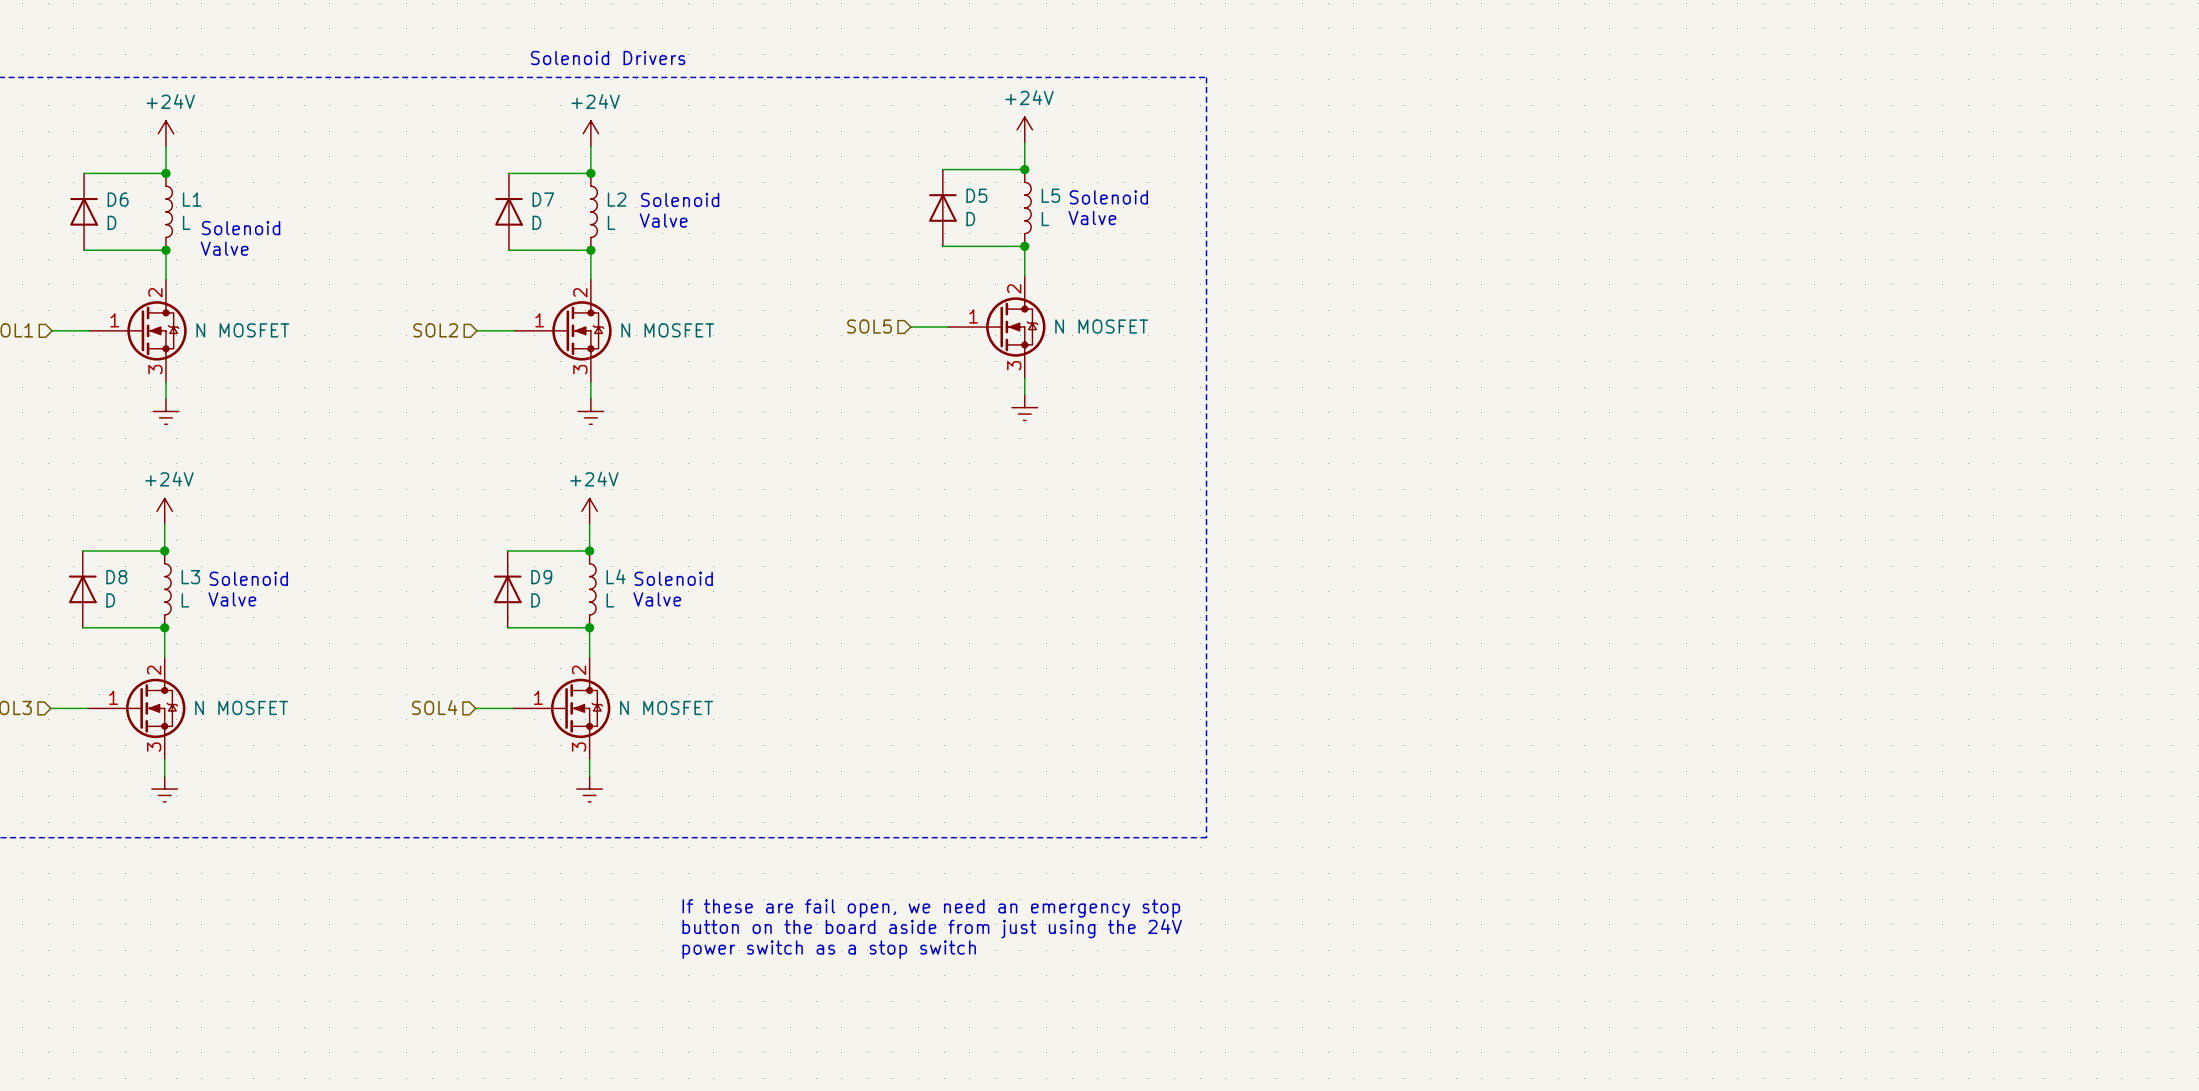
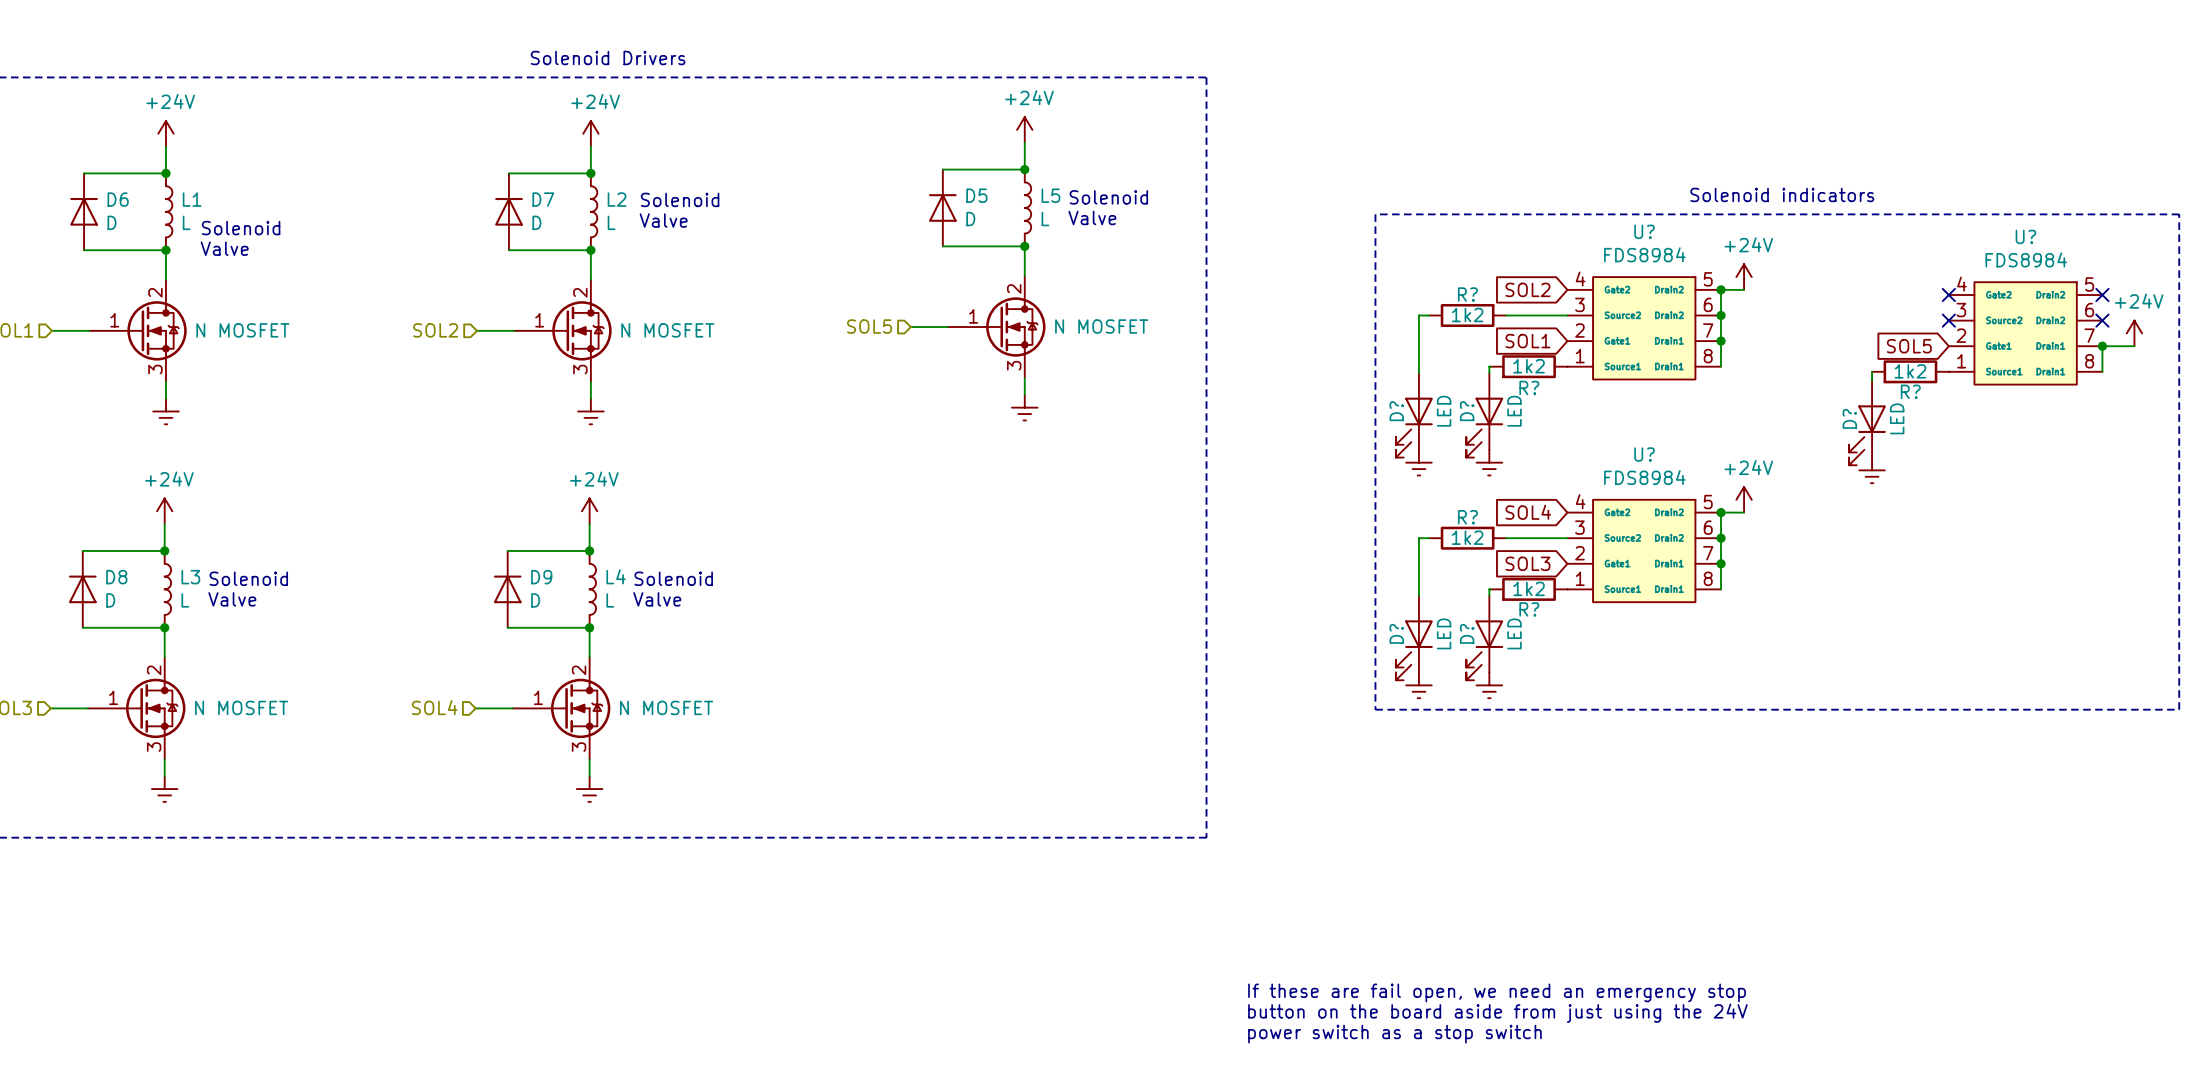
text: none -> Solenoid indicators (1782, 194)
line: none -> (1375, 214) (1375, 709) (2179, 709) (2179, 214) (1375, 214)
power symbol: none -> +24V (1744, 277)
global label: none -> SOL2 (1527, 289)
junction: none -> (1721, 289)
wire: none -> (1744, 289) (1721, 289) (1721, 366)
no-connect mark: none -> (1948, 295)
no-connect mark: none -> (2102, 295)
wire: none -> (1429, 315) (1418, 315) (1418, 373)
R?: none -> 1k2 (1467, 315)
wire: none -> (1506, 315) (1567, 315)
junction: none -> (1721, 315)
no-connect mark: none -> (1948, 320)
no-connect mark: none -> (2102, 320)
U?: none -> FDS8984 (1644, 328)
U?: none -> FDS8984 (2025, 333)
power symbol: none -> +24V (2134, 333)
global label: none -> SOL1 (1527, 341)
junction: none -> (1721, 341)
global label: none -> SOL5 (1909, 346)
junction: none -> (2102, 346)
wire: none -> (2134, 346) (2102, 346) (2102, 371)
wire: none -> (1490, 366) (1489, 373)
R?: none -> 1k2 (1529, 366)
wire: none -> (1872, 371) (1872, 380)
R?: none -> 1k2 (1910, 371)
D?: none -> LED (1414, 415)
D?: none -> LED (1484, 415)
D?: none -> LED (1867, 423)
power symbol: none -> (1418, 462)
power symbol: none -> (1489, 462)
power symbol: none -> (1872, 470)
power symbol: none -> +24V (1744, 499)
global label: none -> SOL4 (1528, 512)
junction: none -> (1721, 512)
wire: none -> (1744, 512) (1721, 512) (1721, 589)
wire: none -> (1429, 538) (1418, 538) (1418, 595)
R?: none -> 1k2 (1467, 538)
wire: none -> (1506, 538) (1567, 538)
junction: none -> (1721, 538)
U?: none -> FDS8984 (1644, 550)
global label: none -> SOL3 (1527, 563)
junction: none -> (1721, 563)
wire: none -> (1490, 589) (1489, 595)
R?: none -> 1k2 (1529, 589)
D?: none -> LED (1414, 638)
D?: none -> LED (1484, 638)
power symbol: none -> (1418, 685)
power symbol: none -> (1489, 685)
text: If these are fail open, we need an emergency stop (931, 908) -> none
text: button on the board aside from just using the 24V (932, 928) -> none
text: power switch as a stop switch (829, 949) -> none
text: none -> If these are fail open, we need an emergency stop (1497, 992)
text: none -> button on the board aside from just using the 24V (1497, 1013)
text: none -> power switch as a stop switch (1394, 1034)

